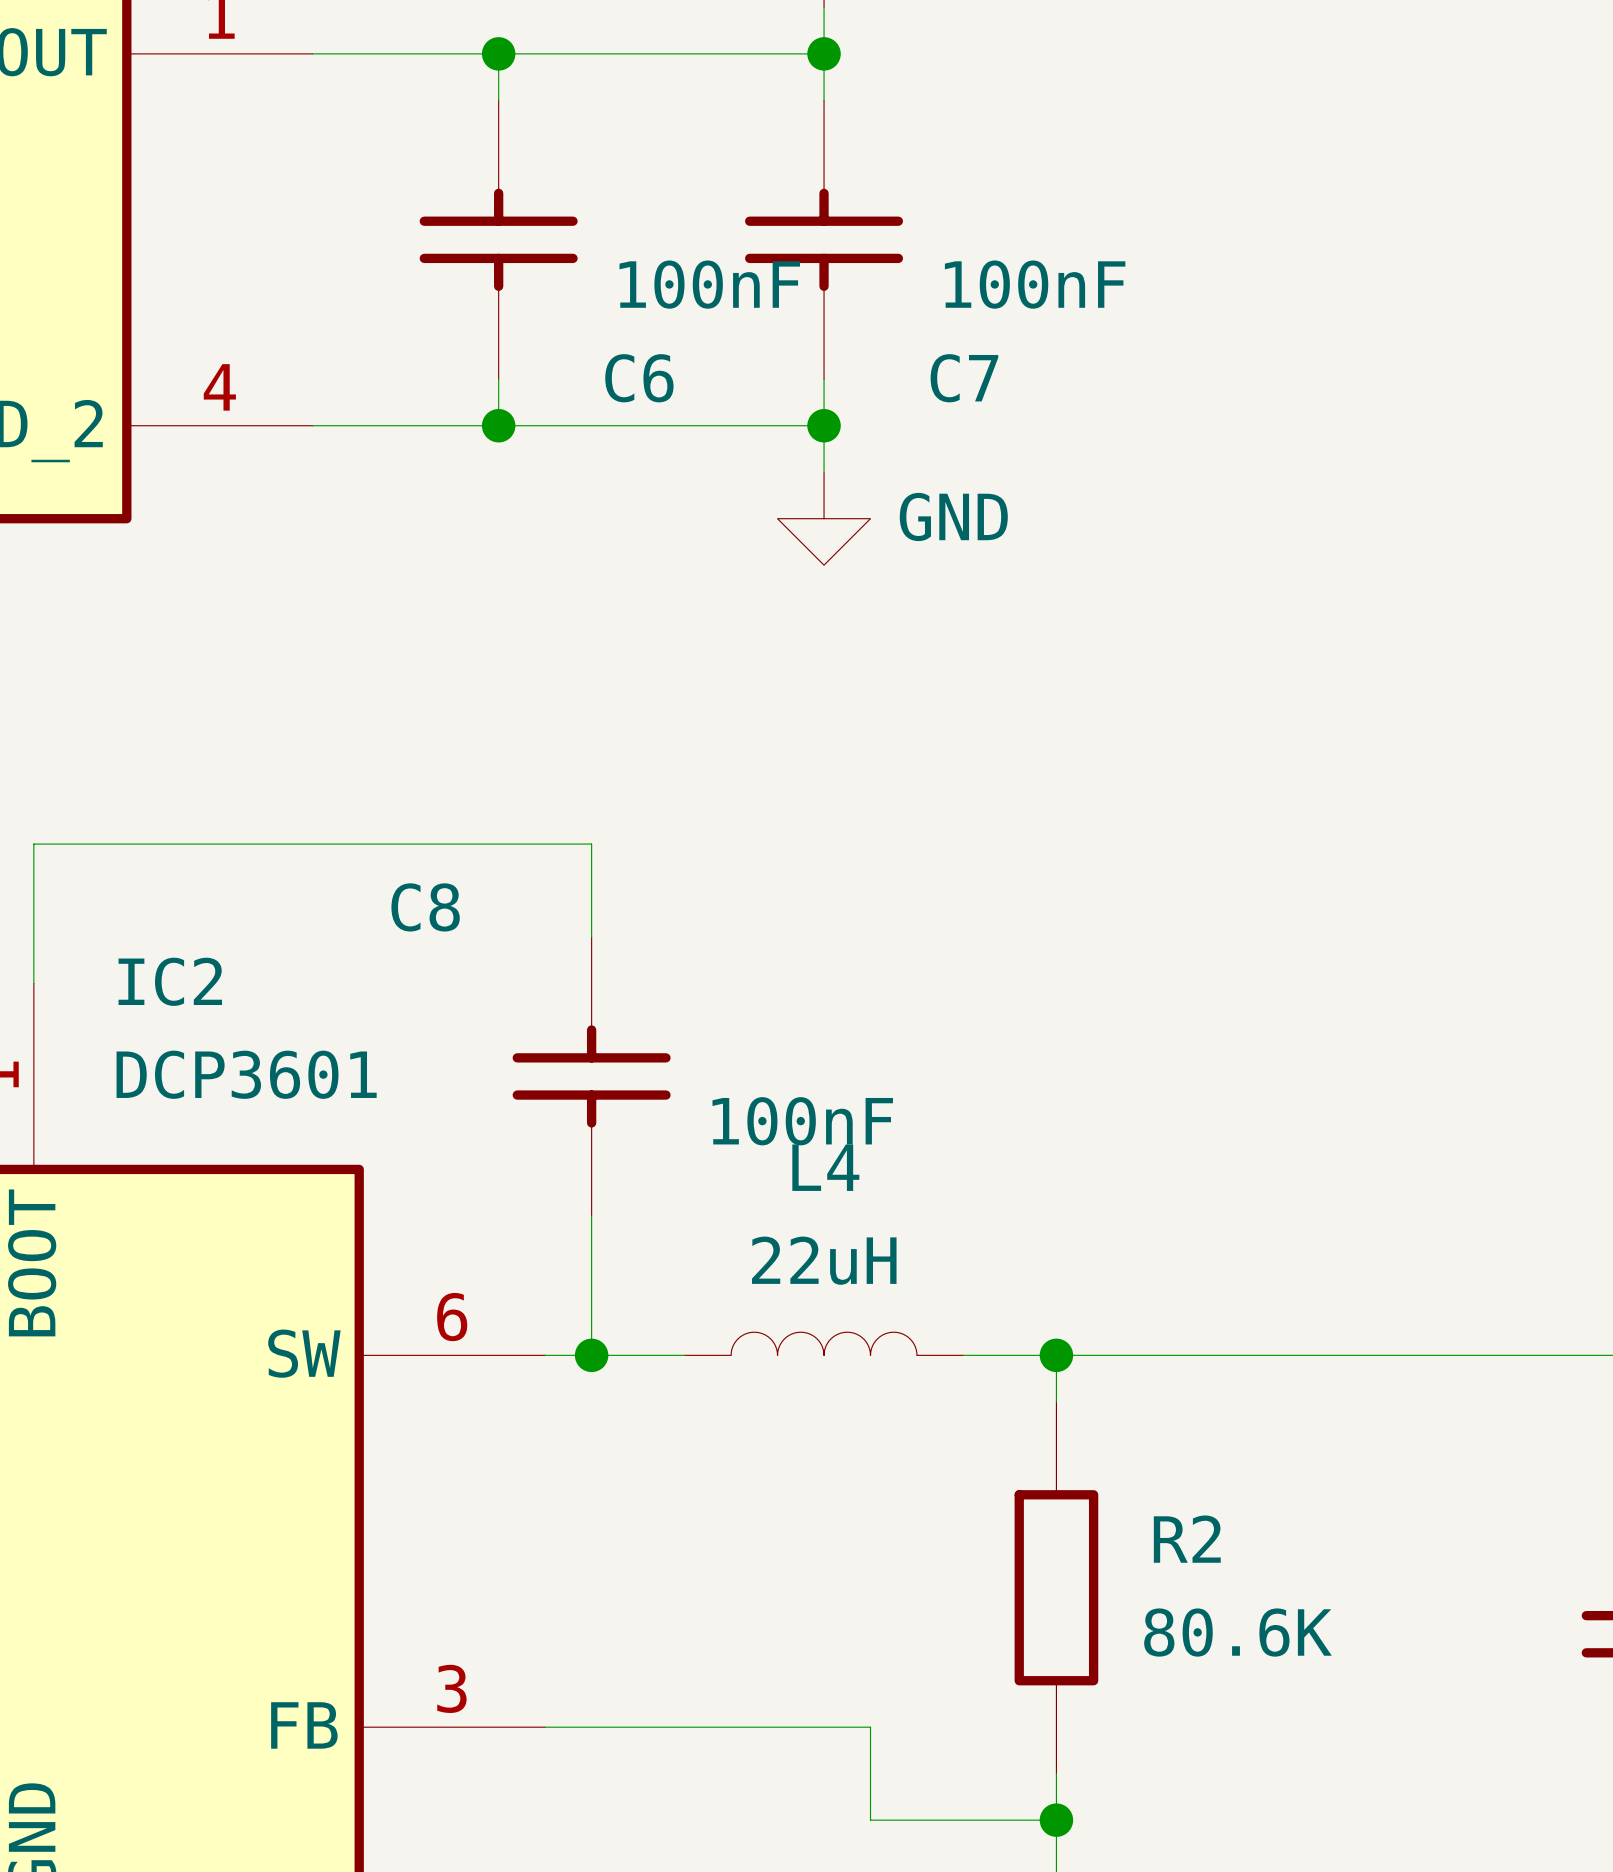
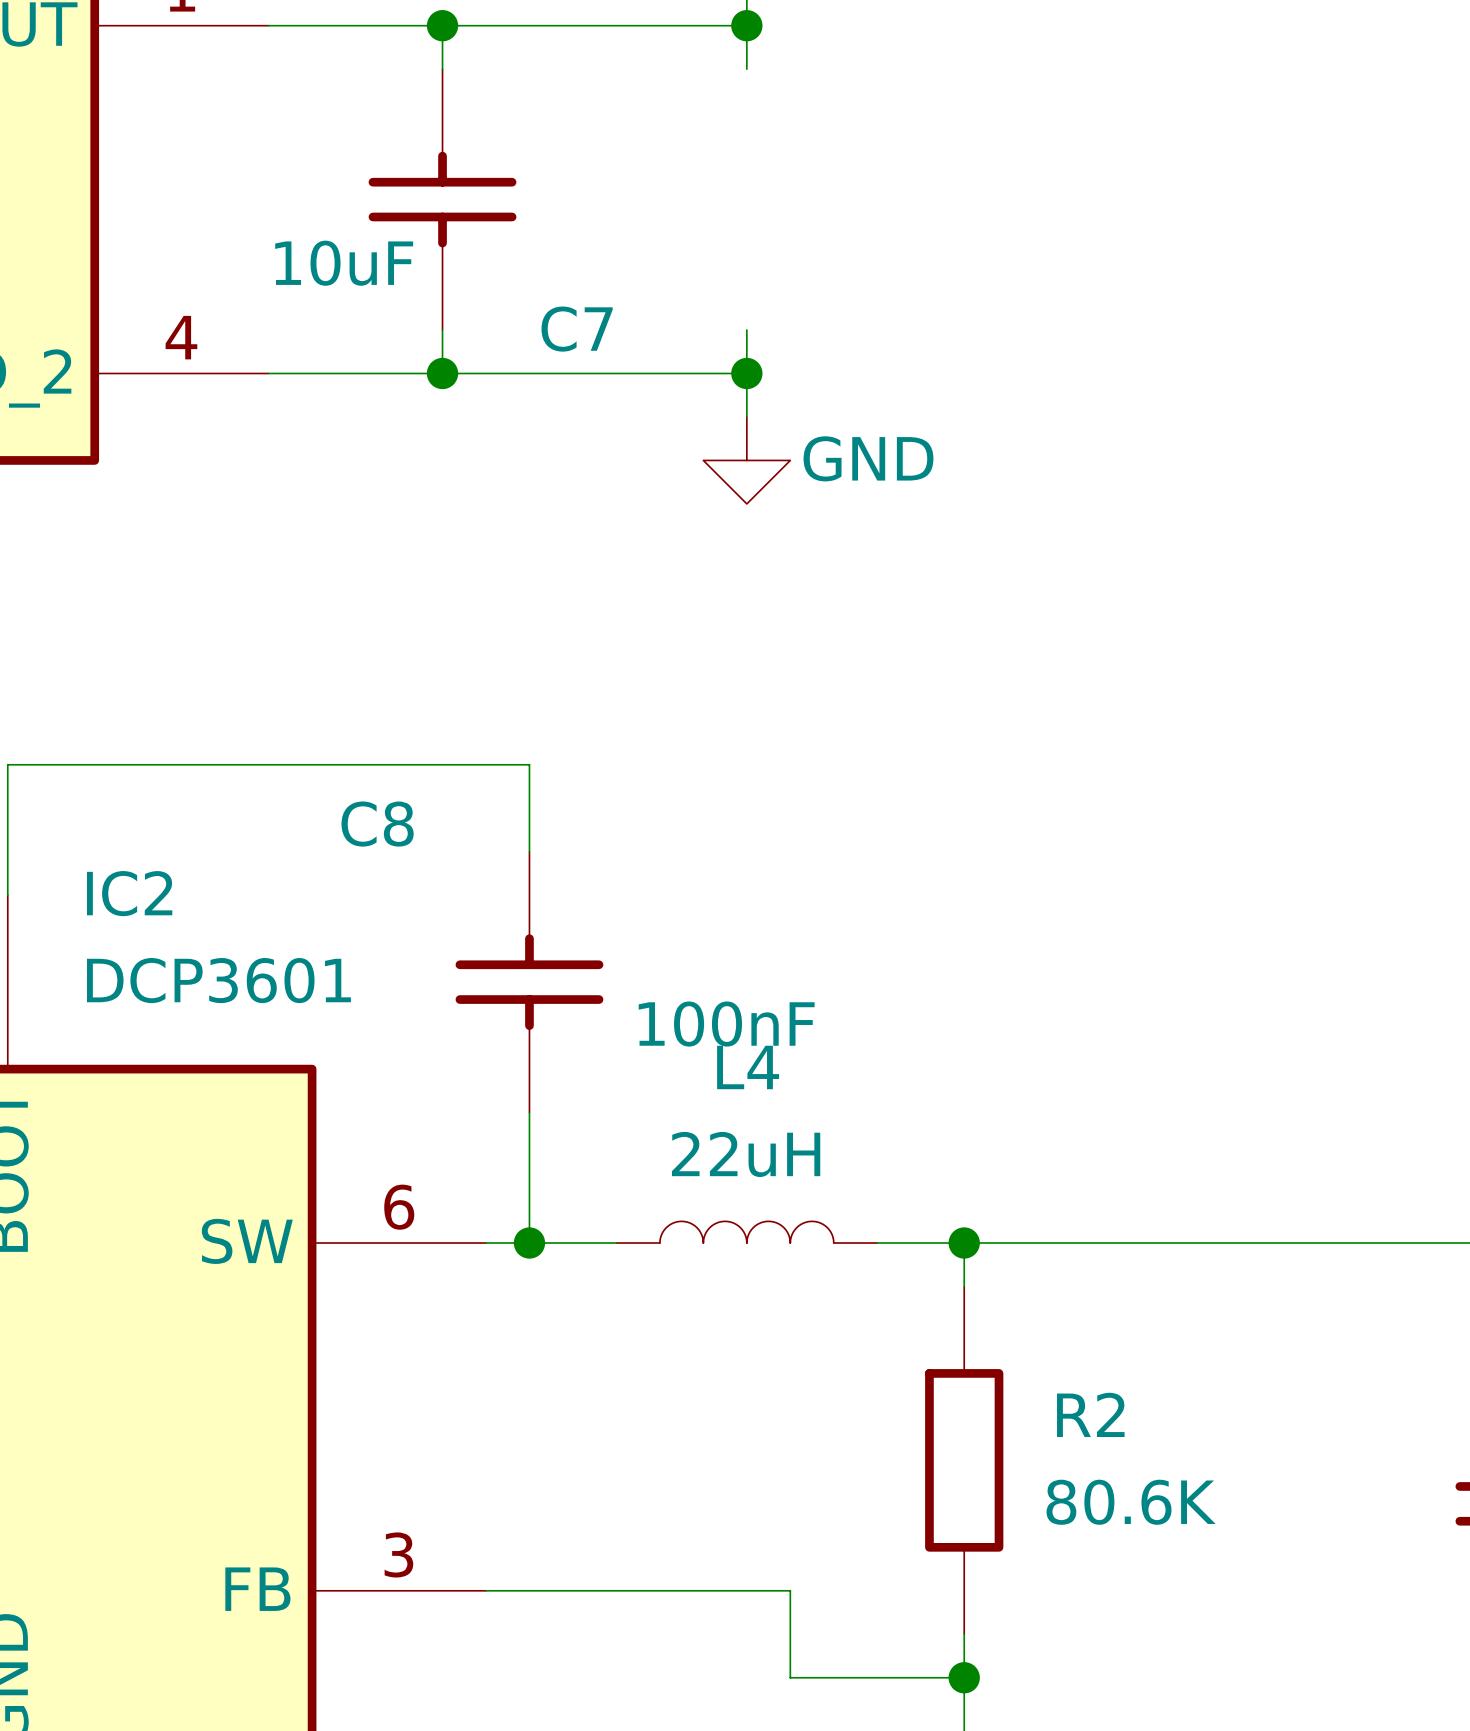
C7: (824, 239) -> none
C6 text: 100nF (709, 284) -> 10uF (344, 263)
C6 name: C6 (639, 378) -> C7 (577, 329)

